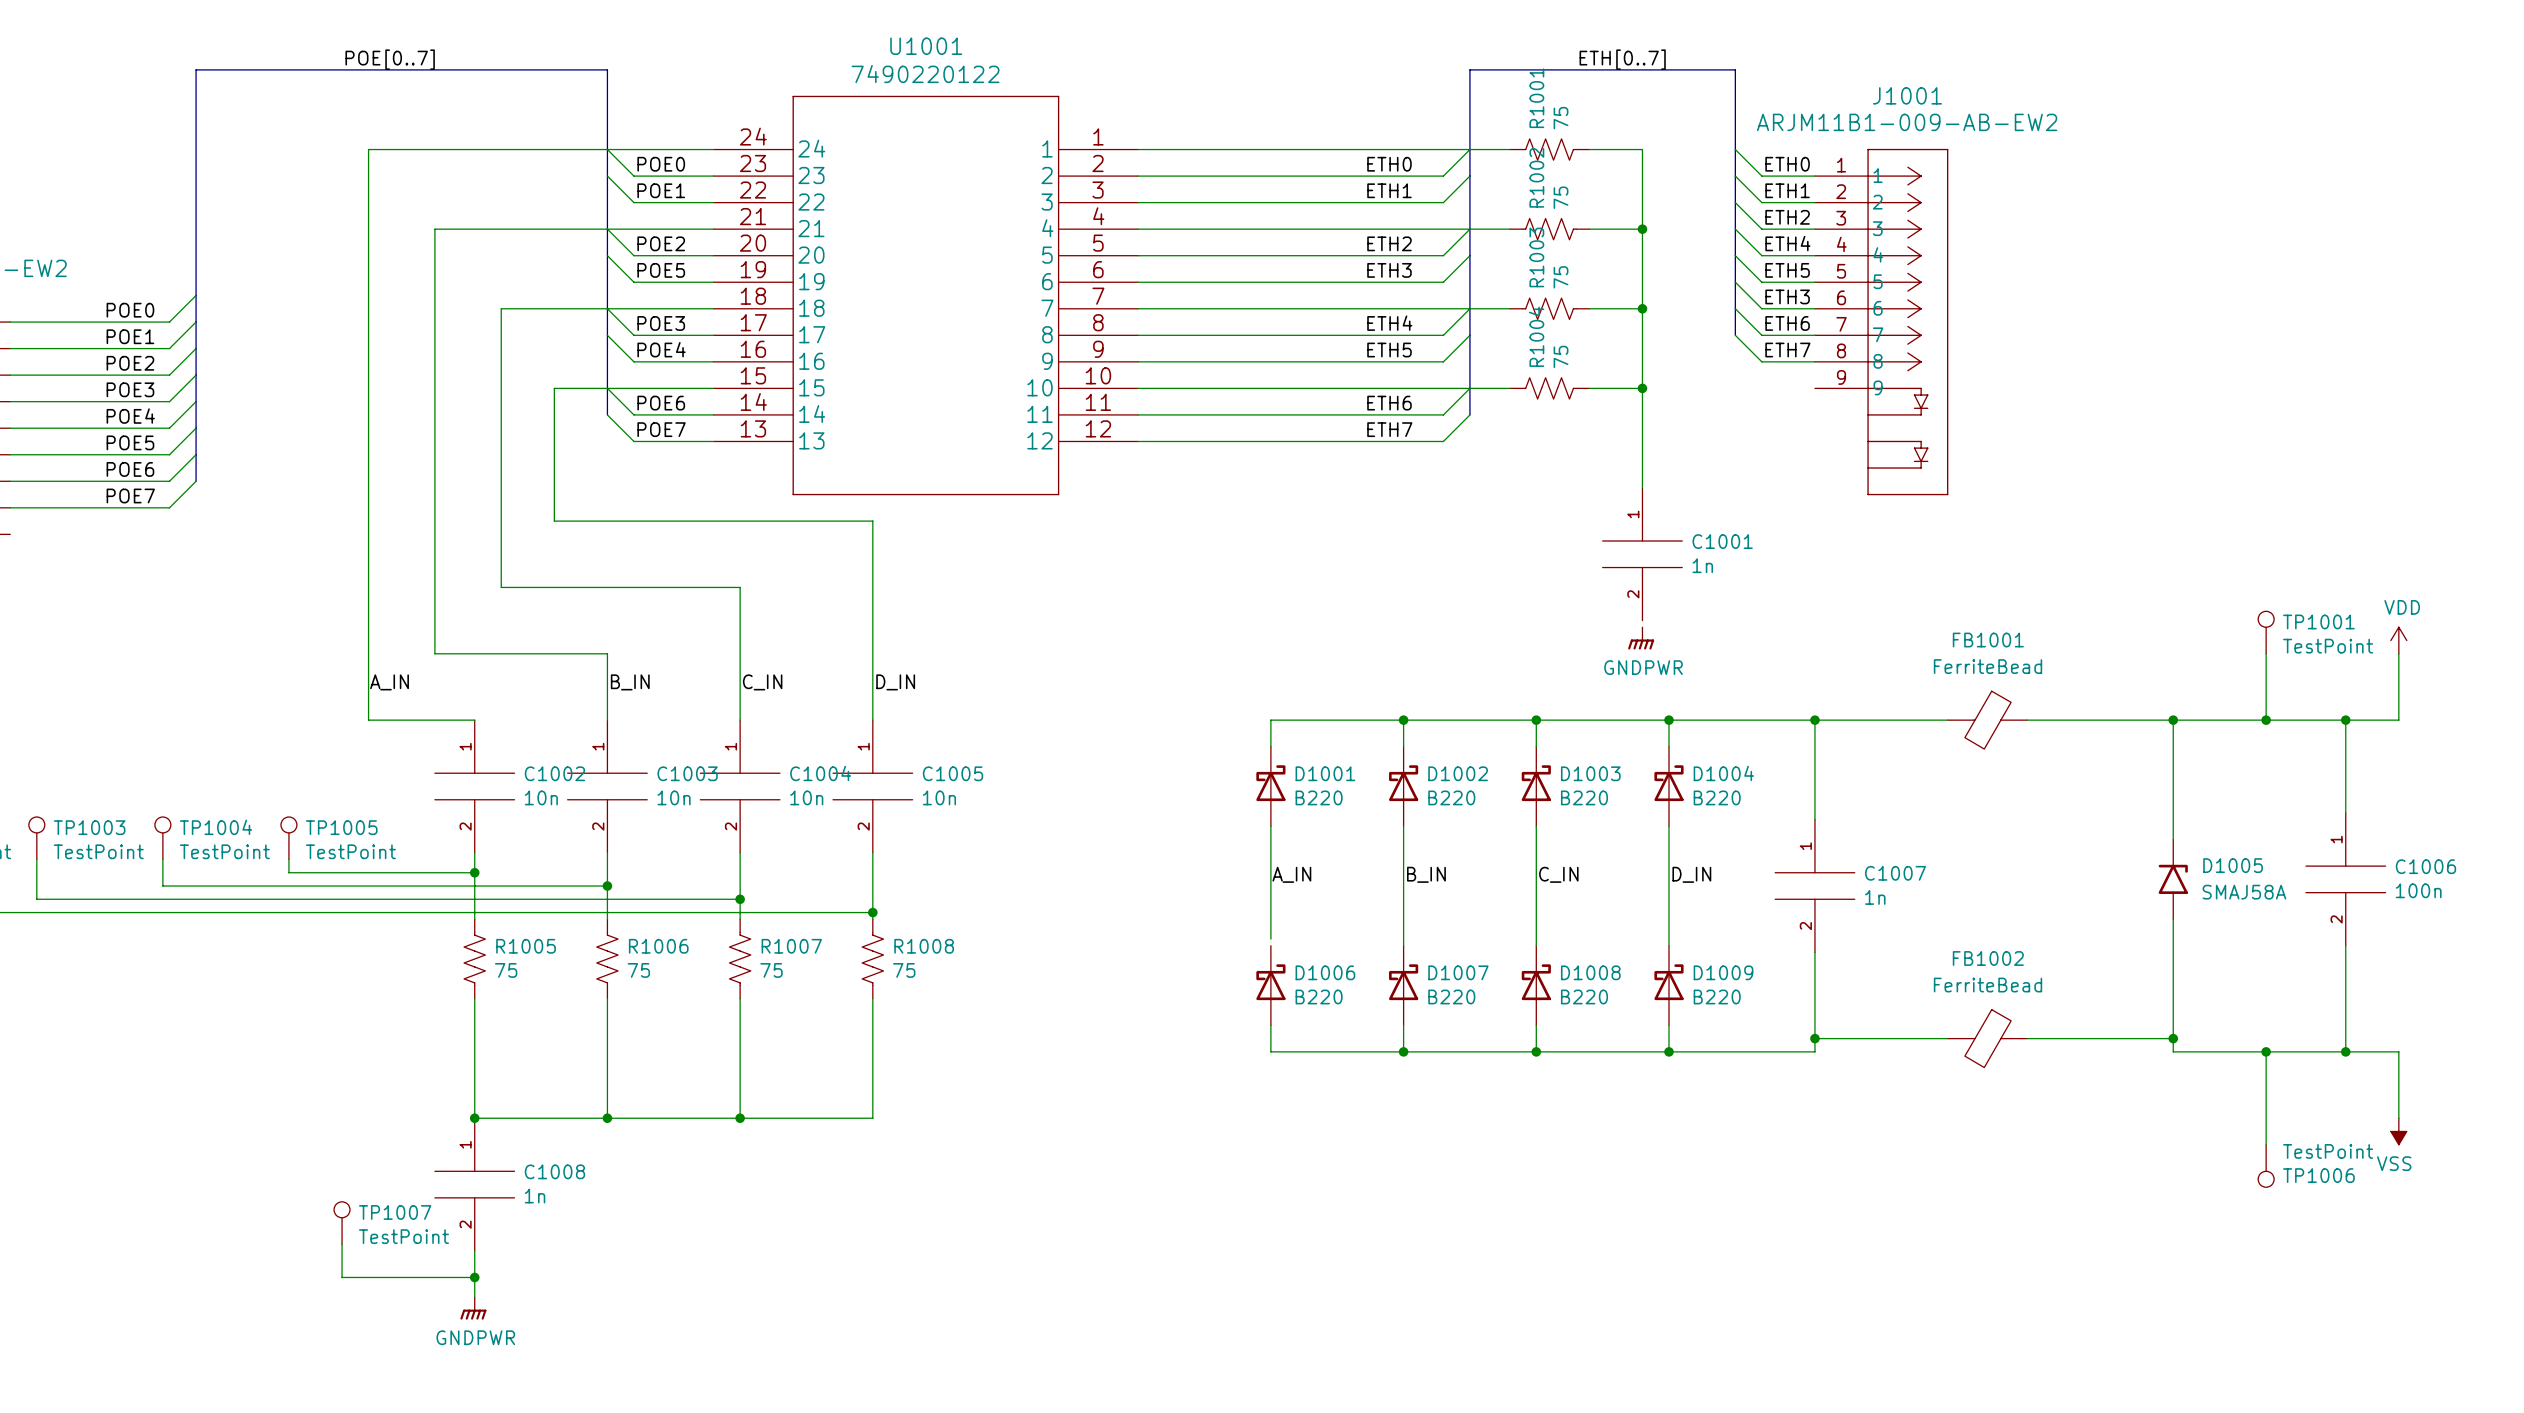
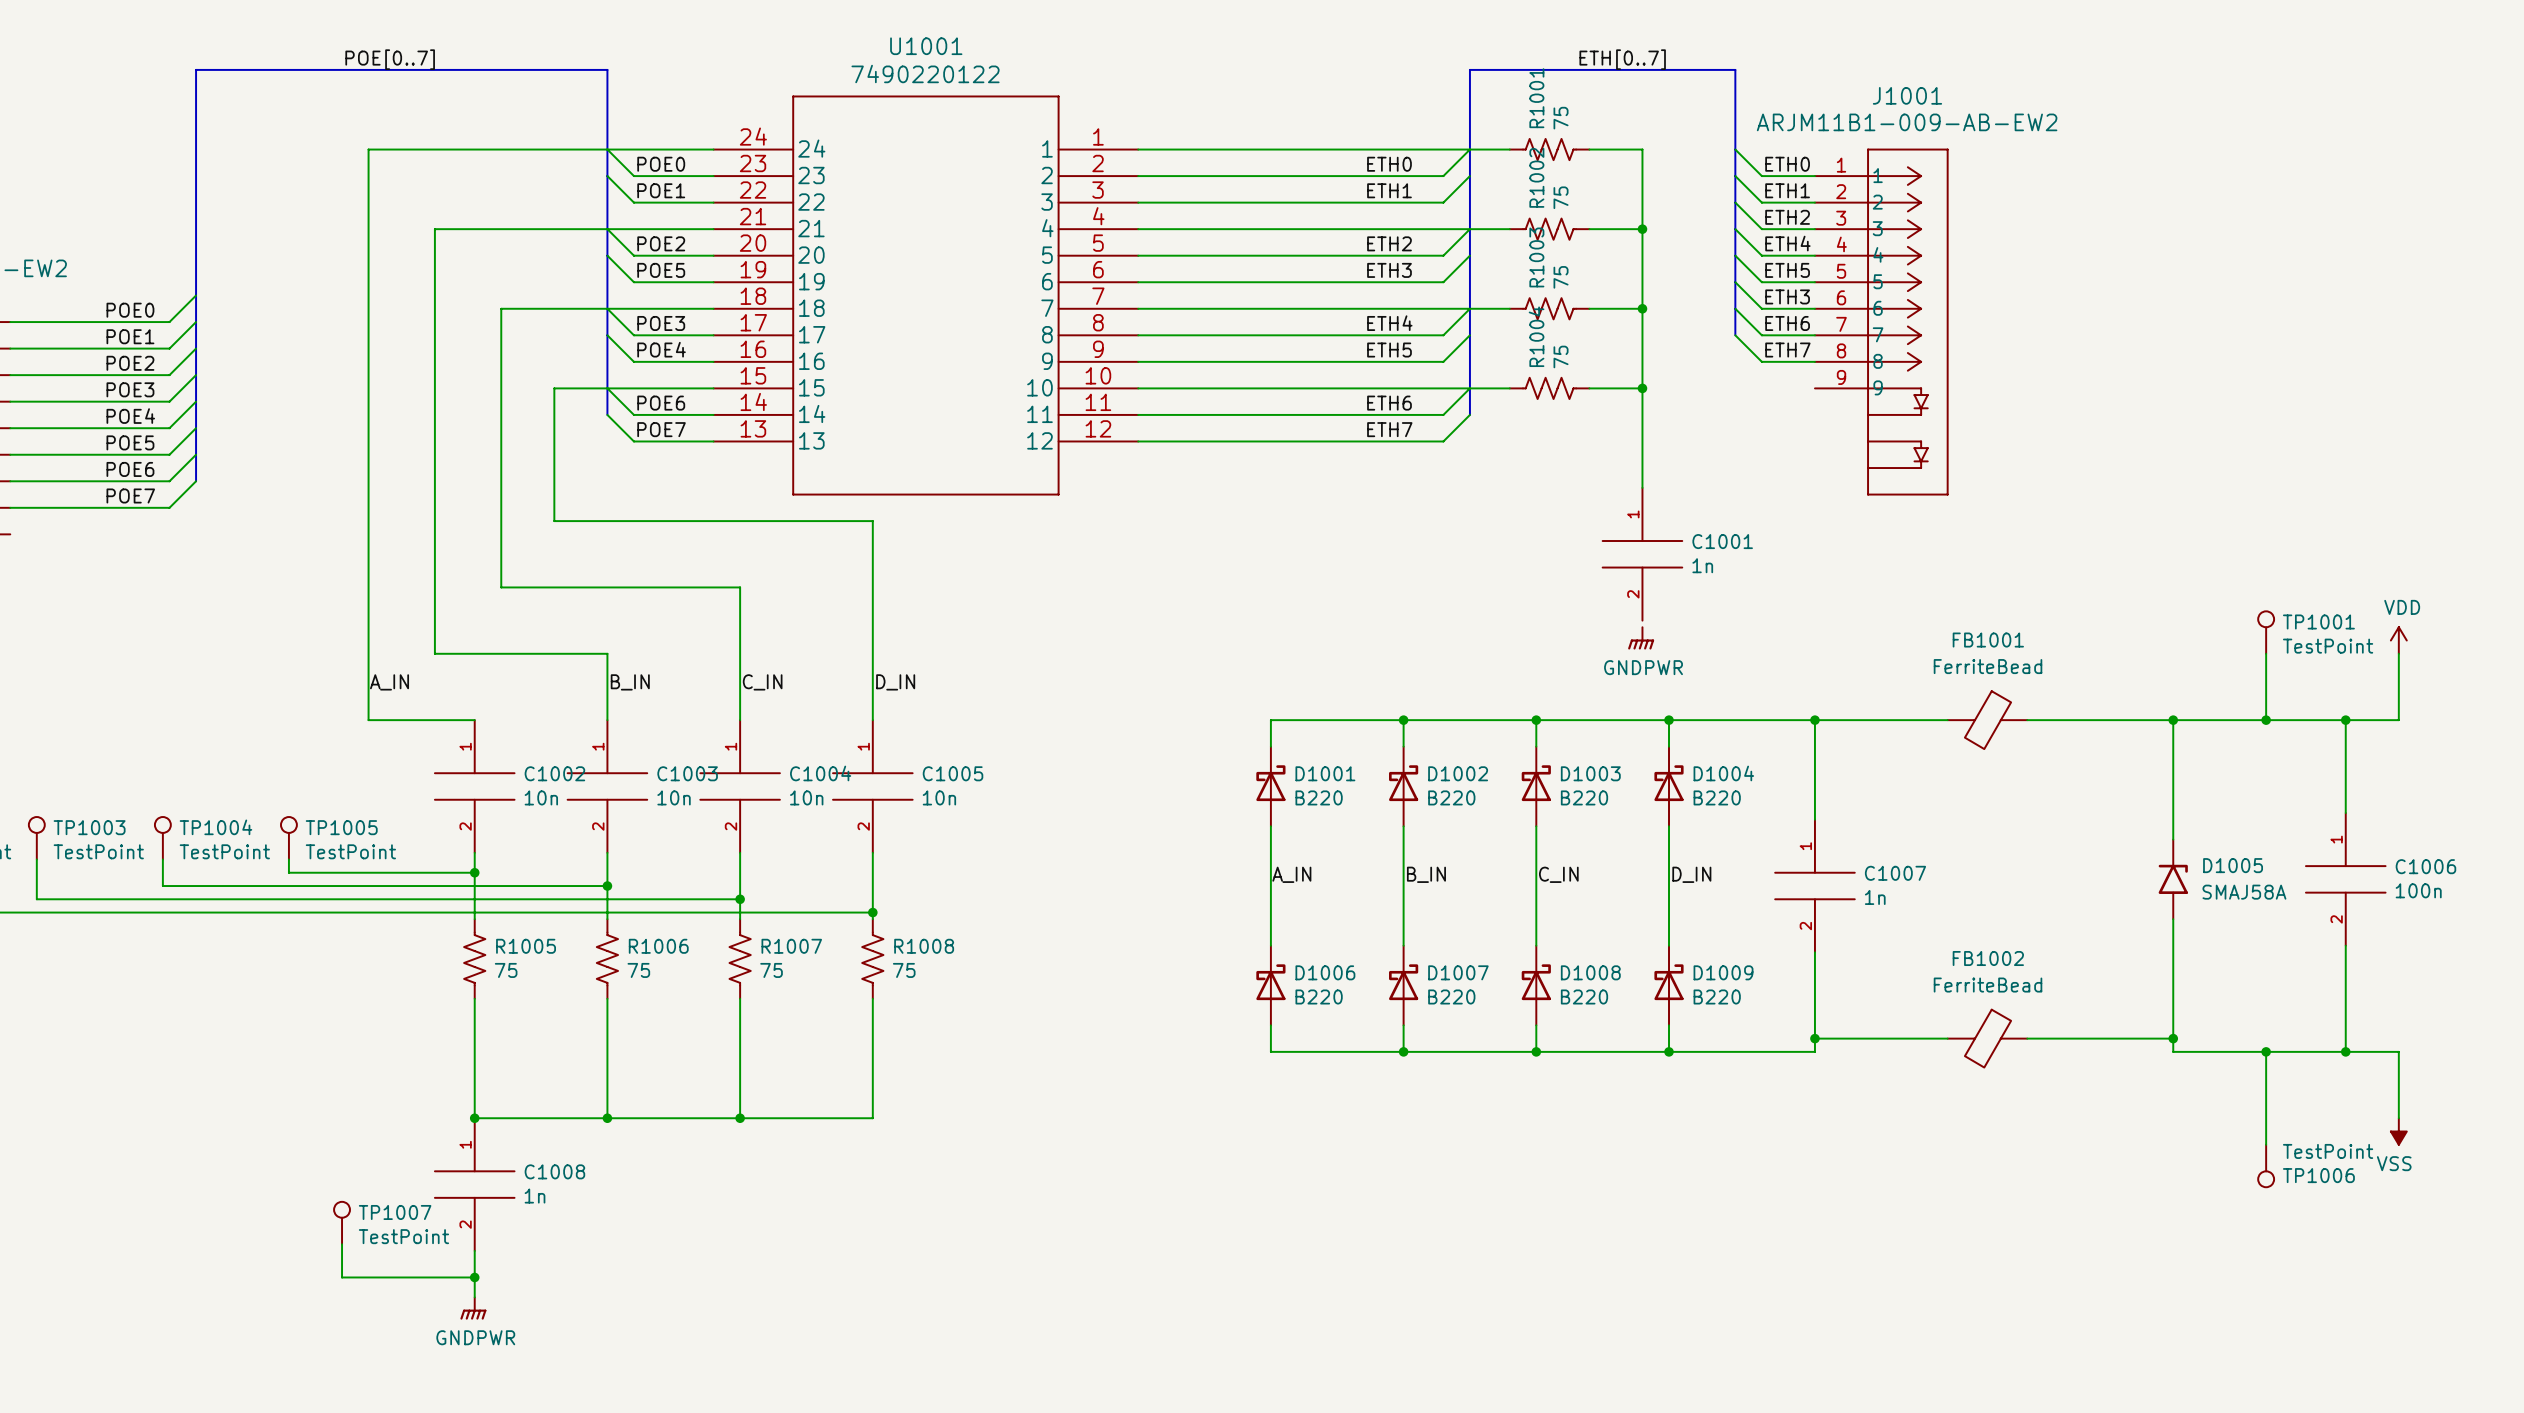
wire: none -> (1270, 939) (1270, 945)

